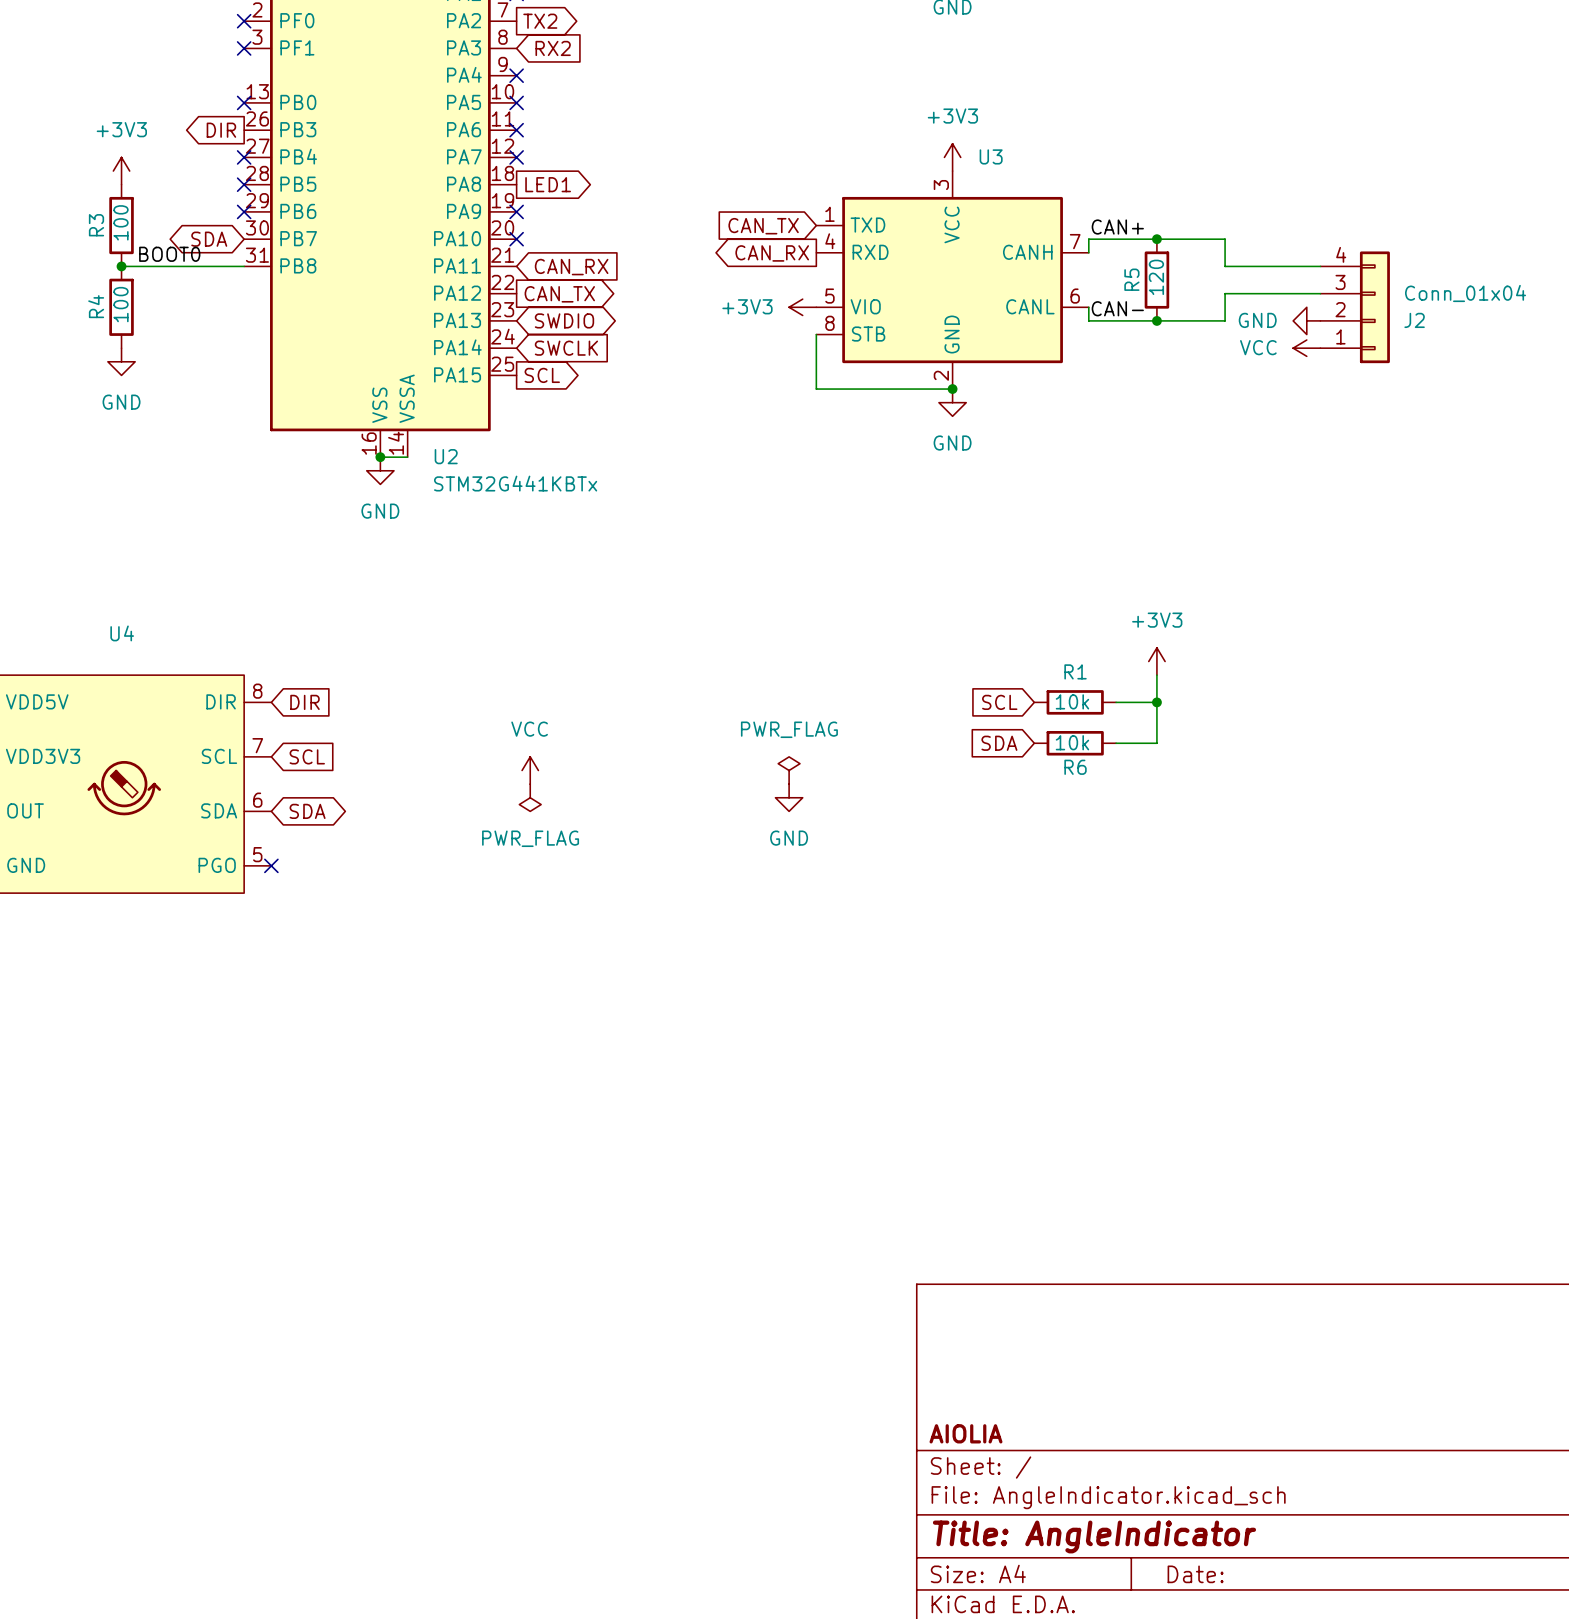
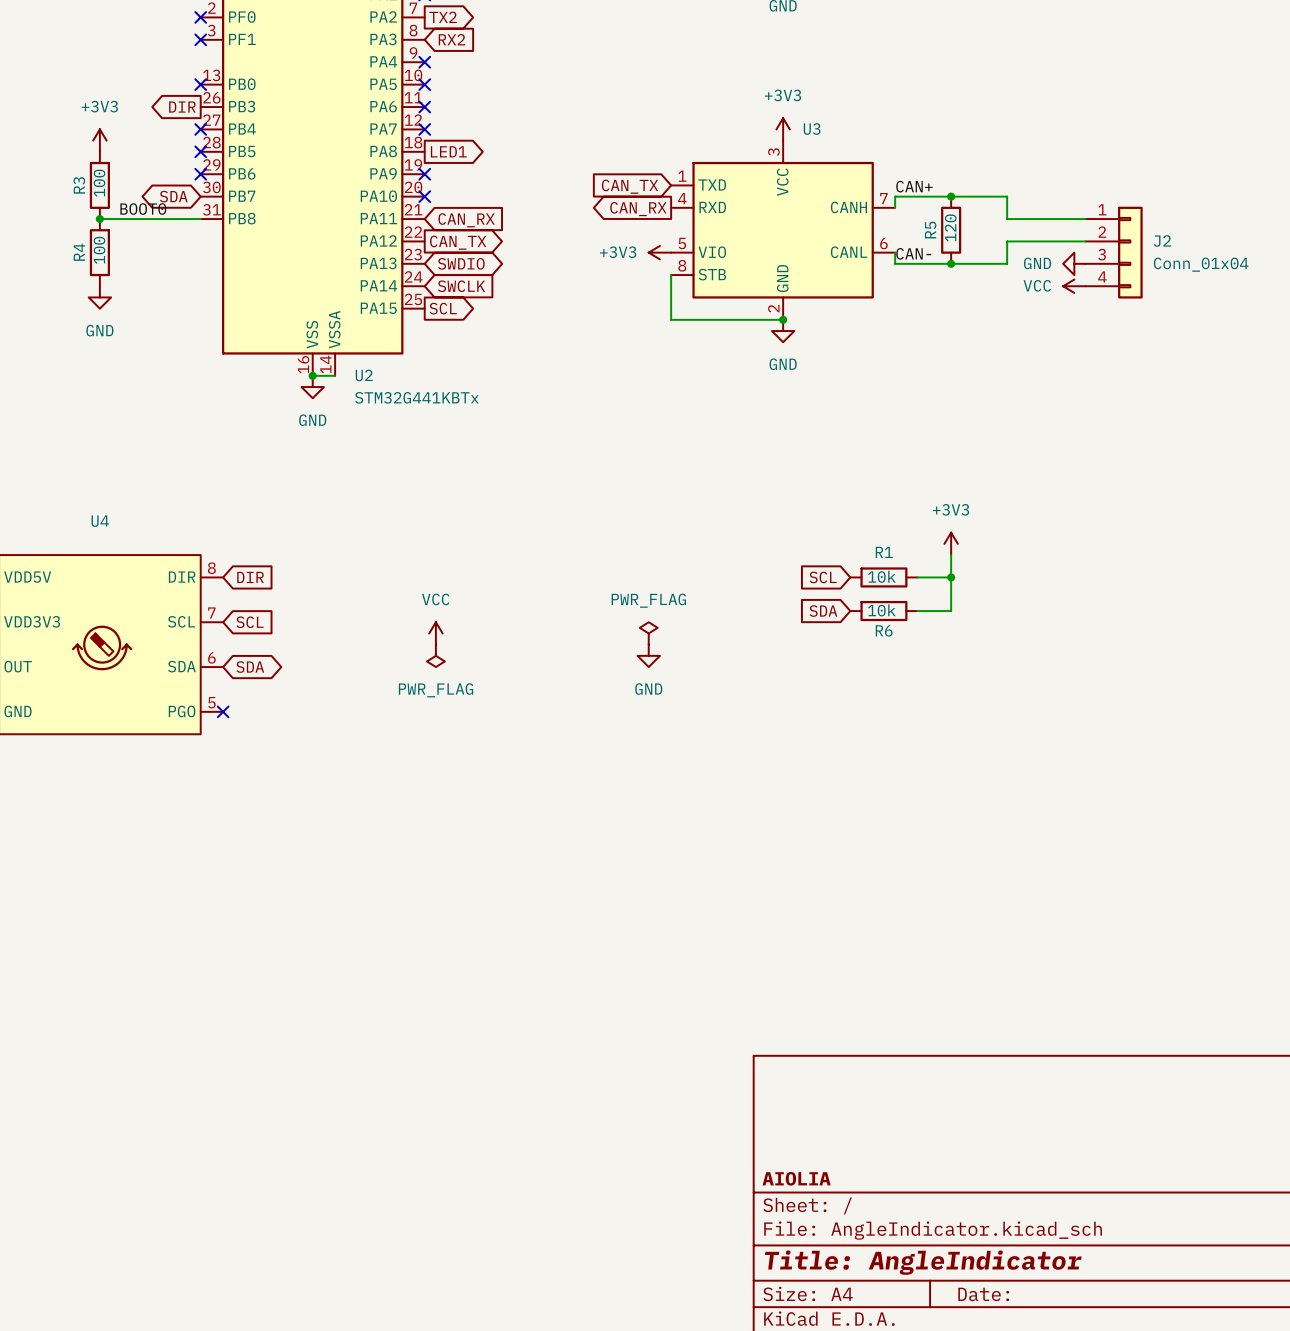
J2 flip: as is (1374, 307) -> up-down (1130, 252)

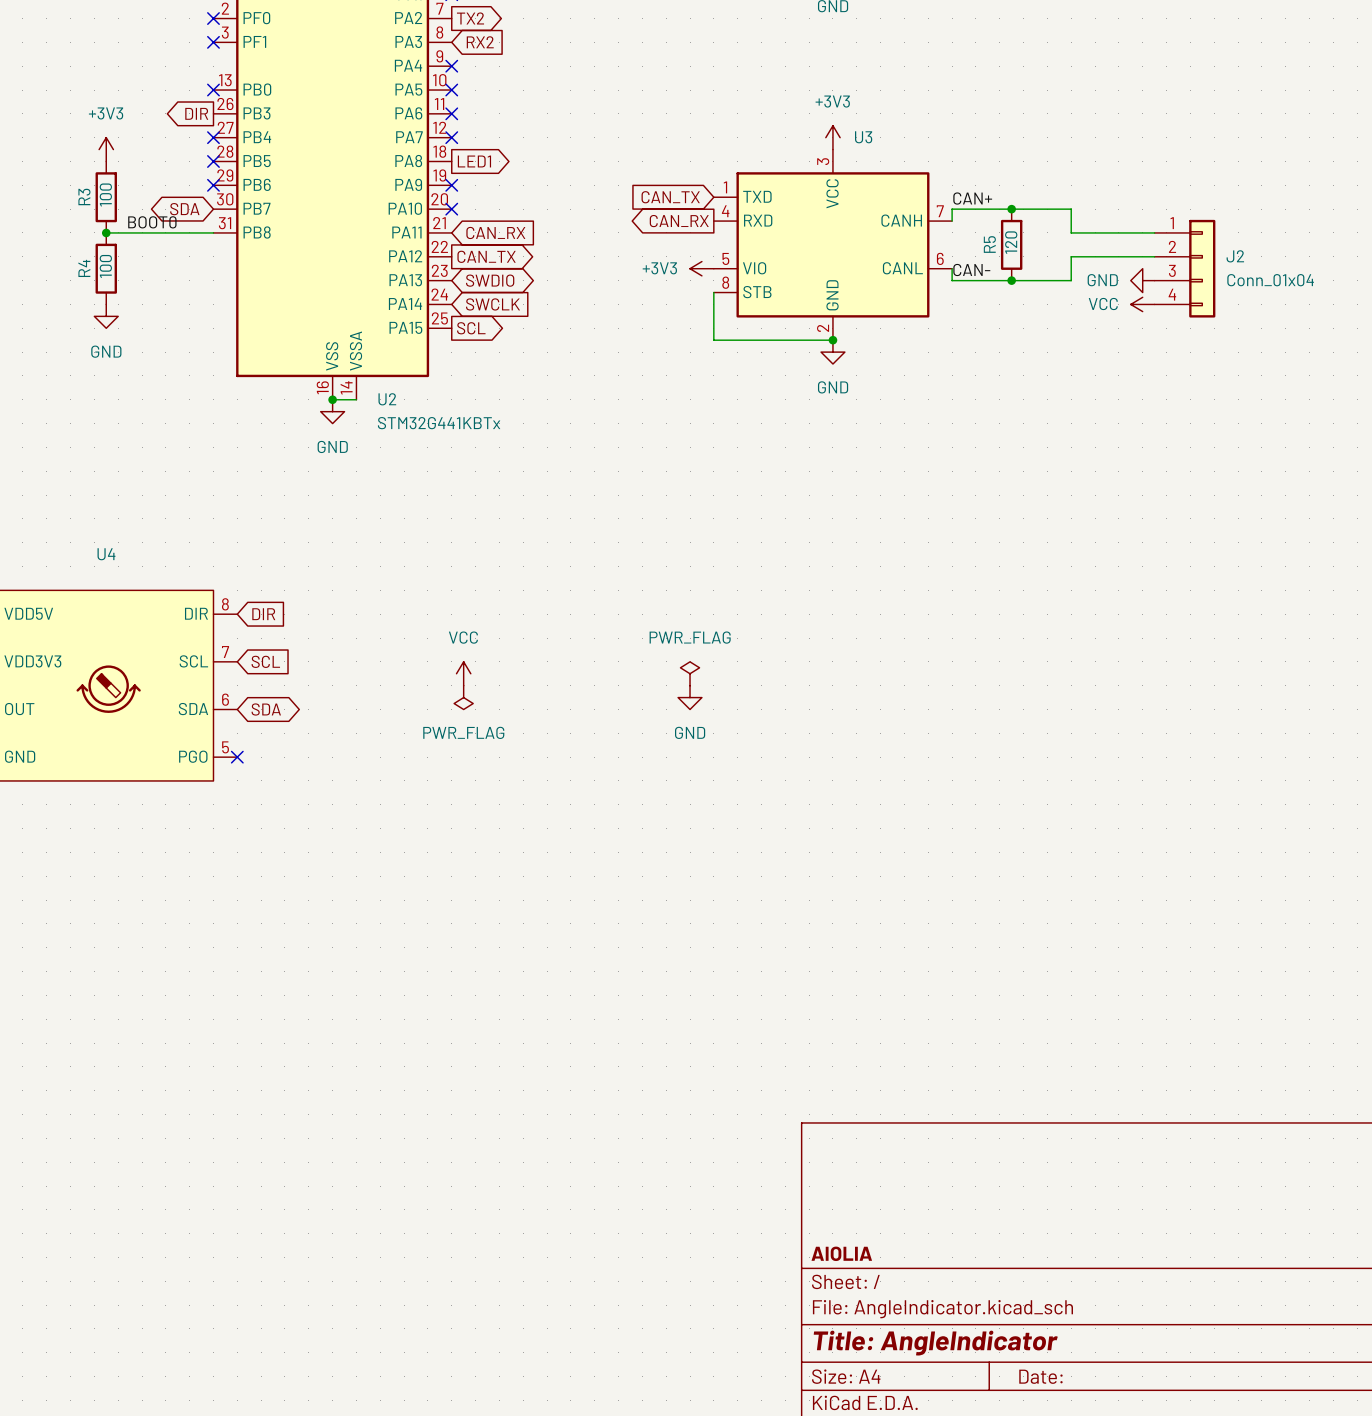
power symbol: +3V3 (951, 543) -> none
wire: (951, 555) (951, 611) (917, 611) -> none
global label: SCL (823, 577) -> none
R1: 10k (883, 577) -> none
wire: (917, 577) (951, 577) -> none
junction: (951, 577) -> none
global label: SDA (823, 611) -> none
R6: 10k (883, 611) -> none

